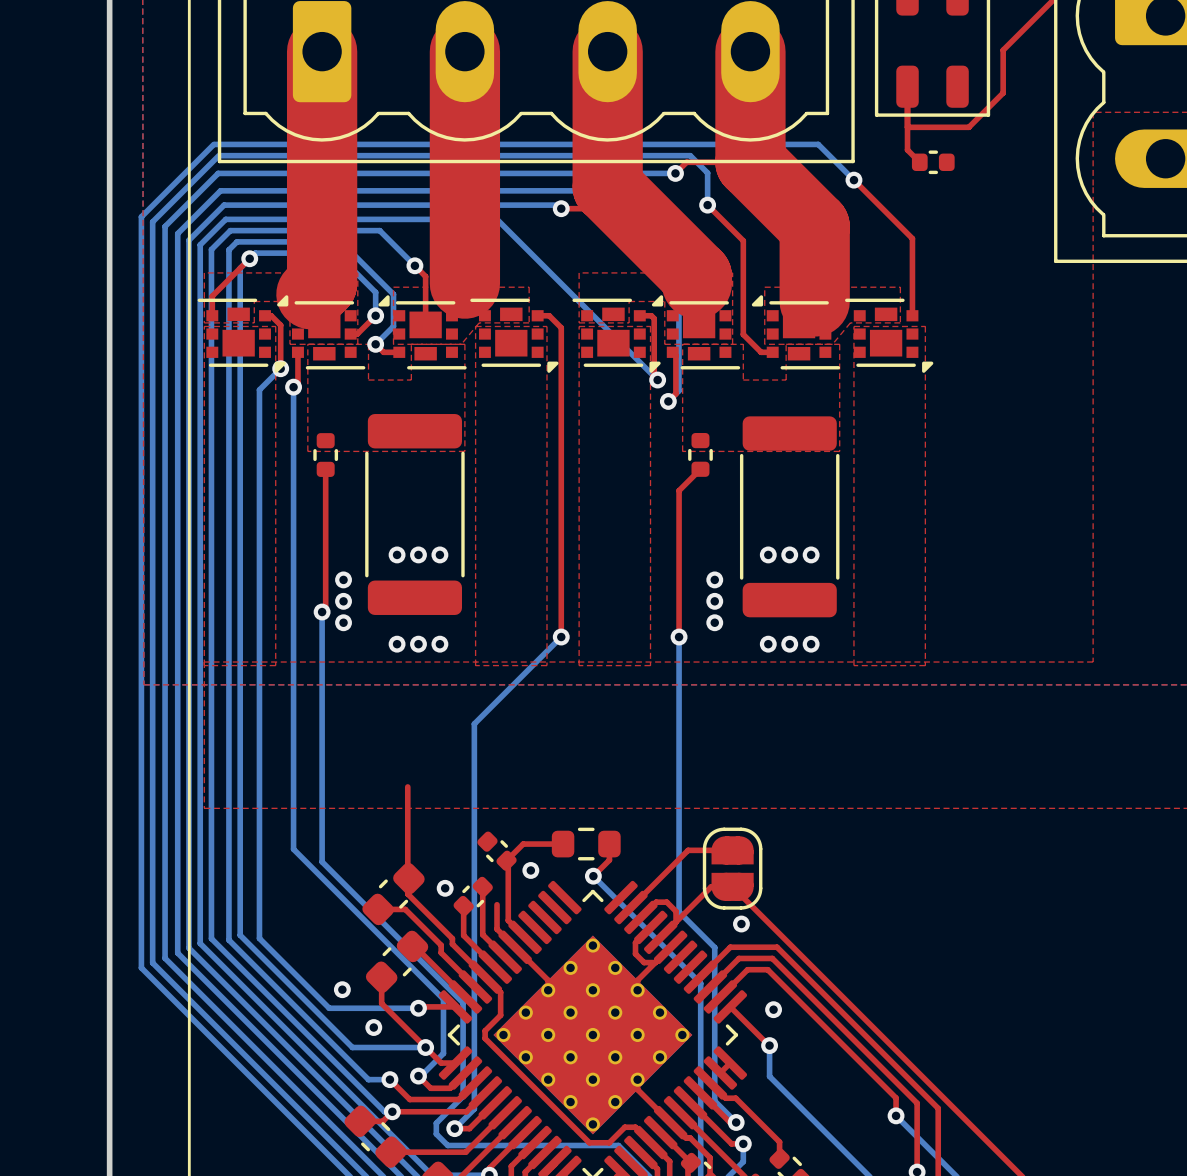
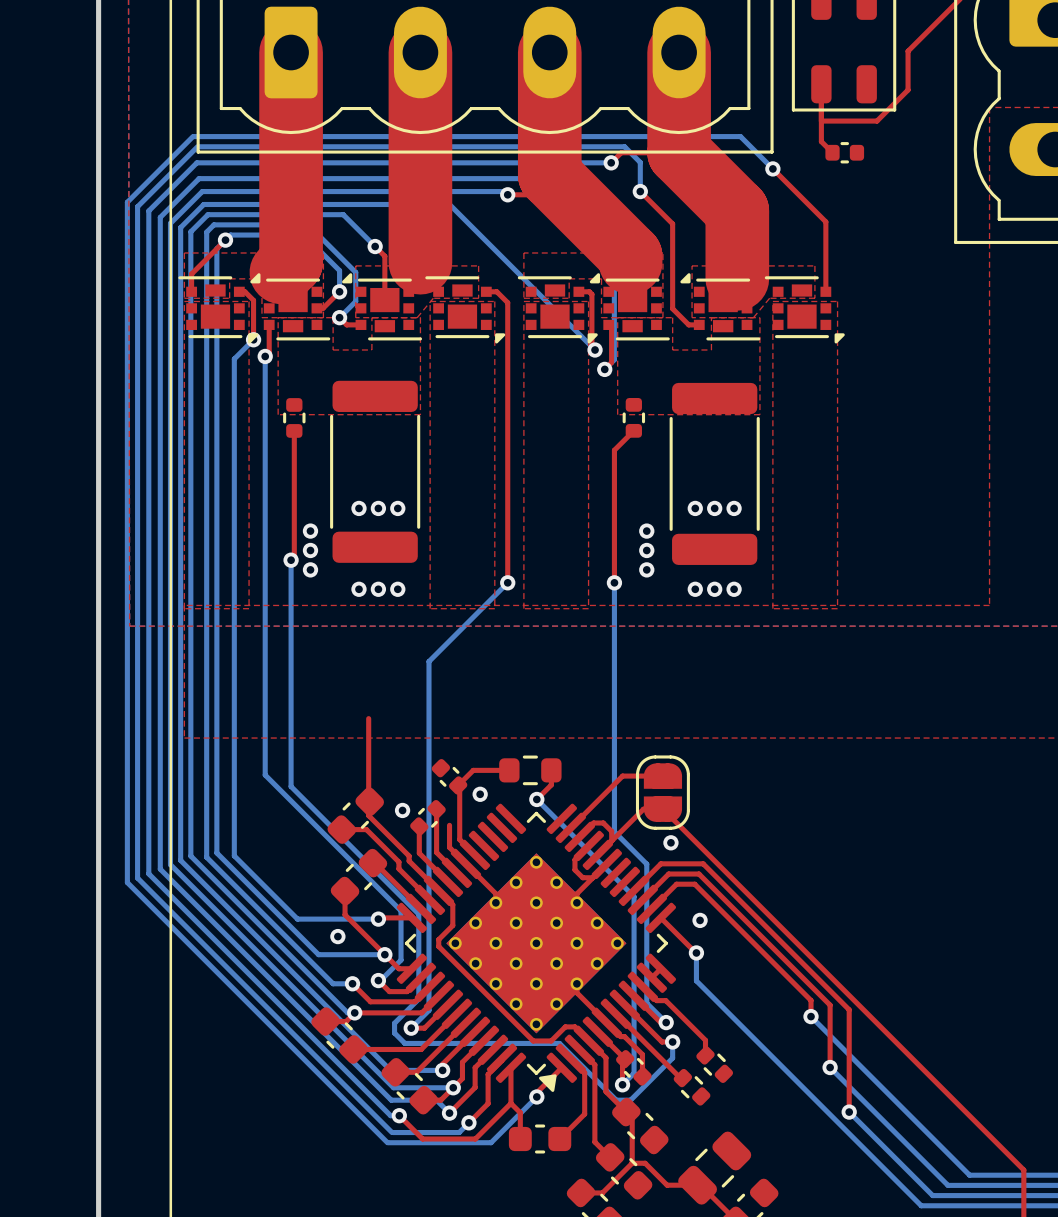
via: (342, 989) -> none

